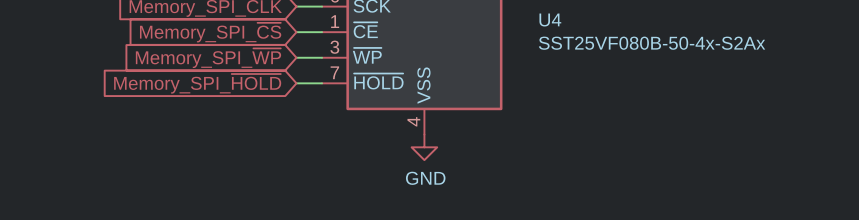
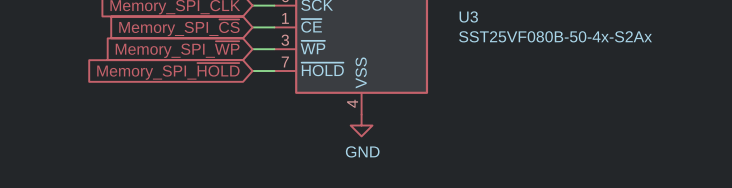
U4 name: U4 (550, 20) -> U3 (468, 16)

